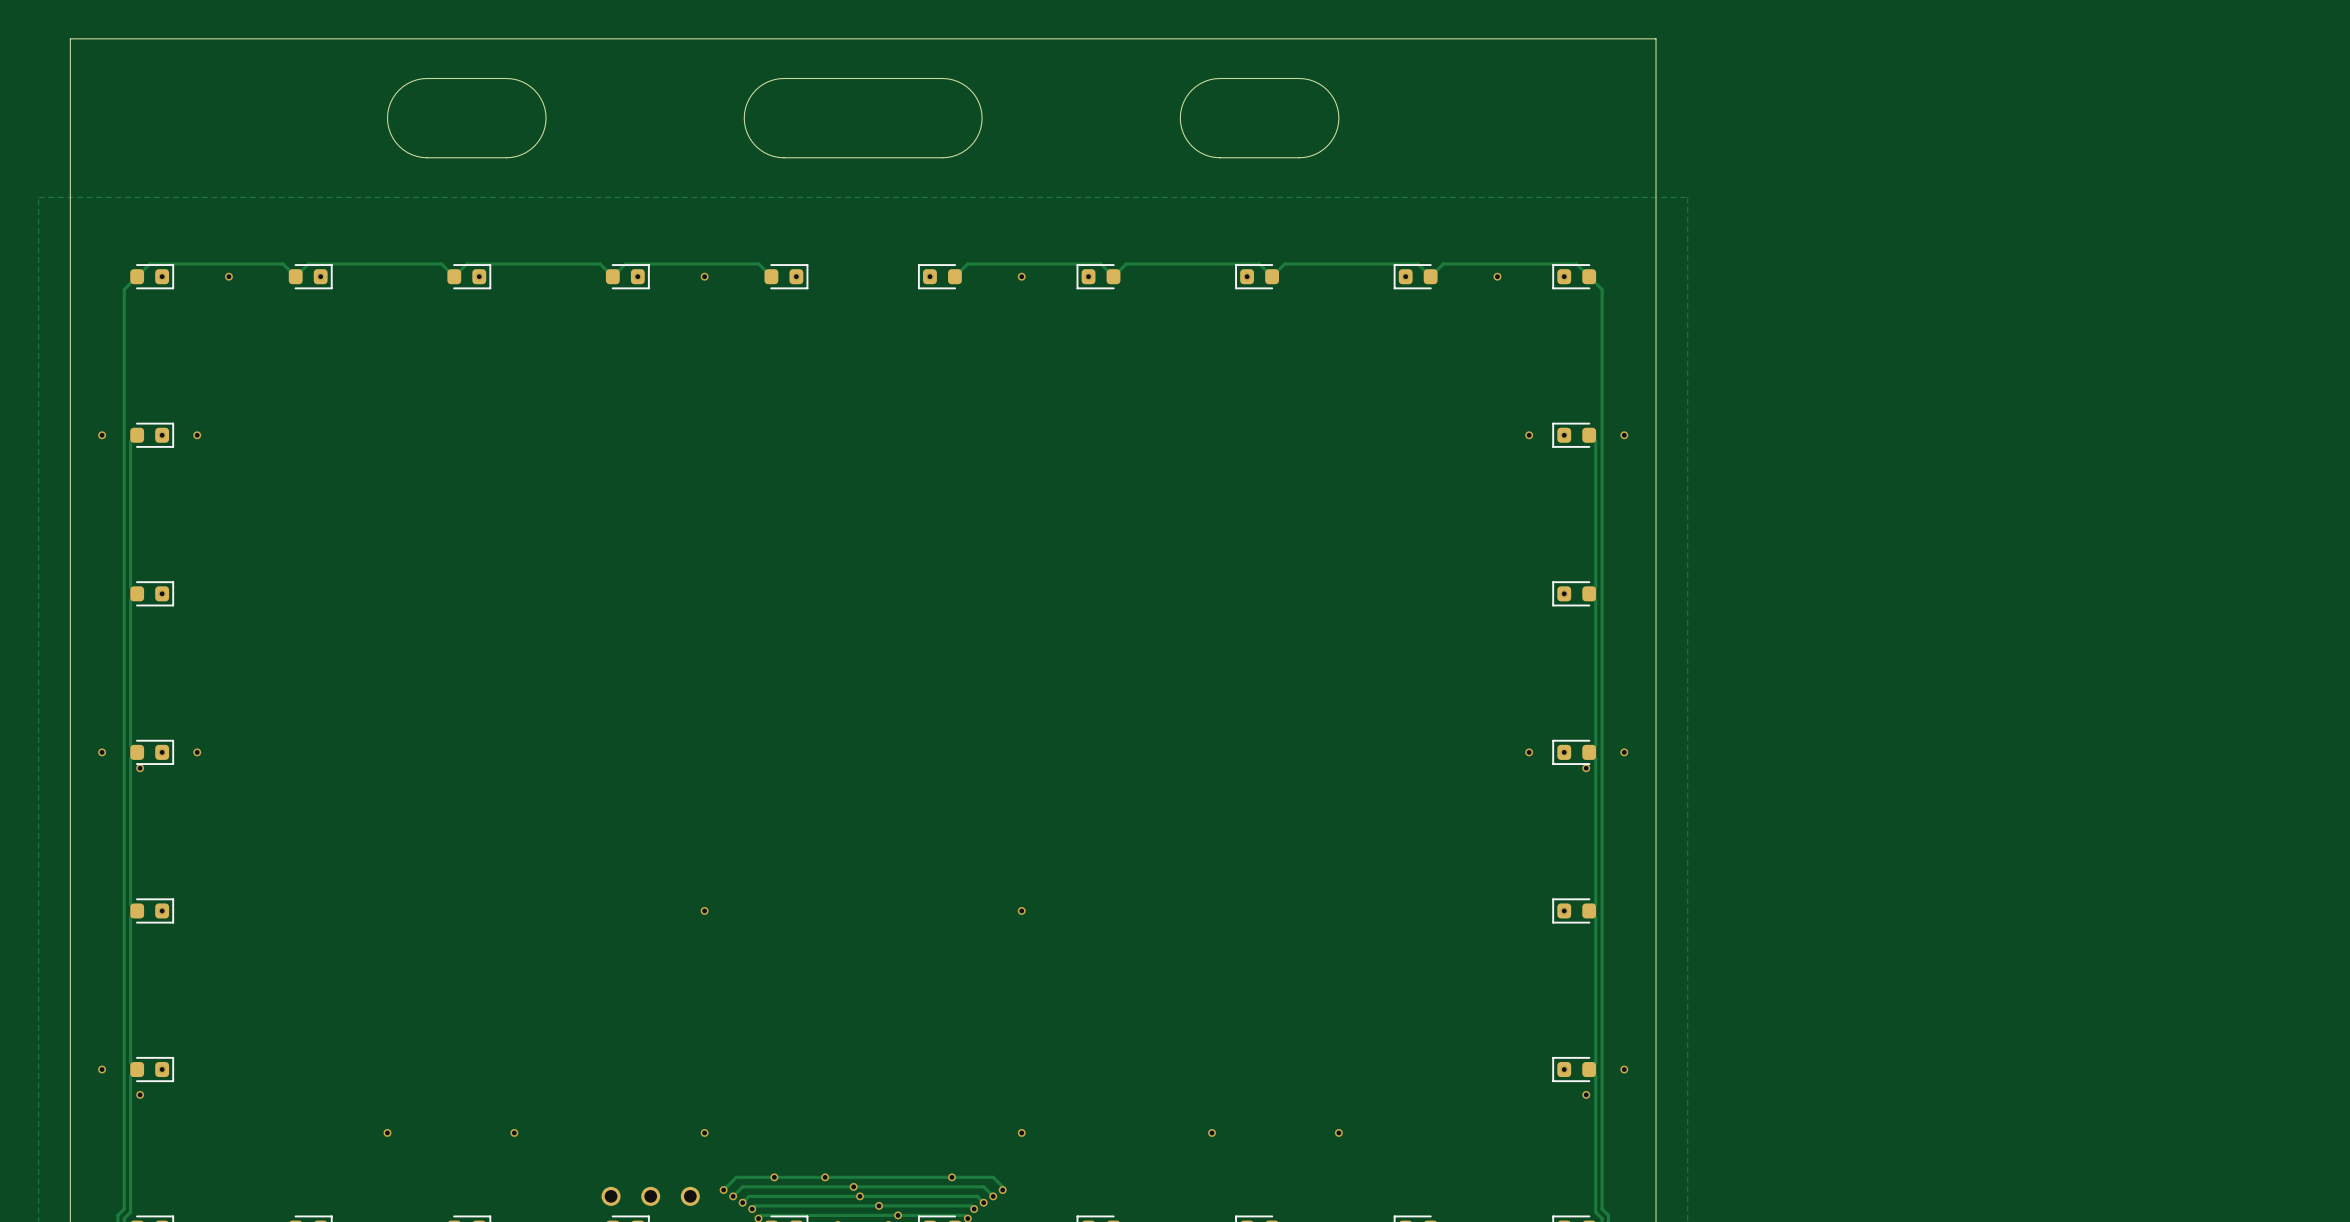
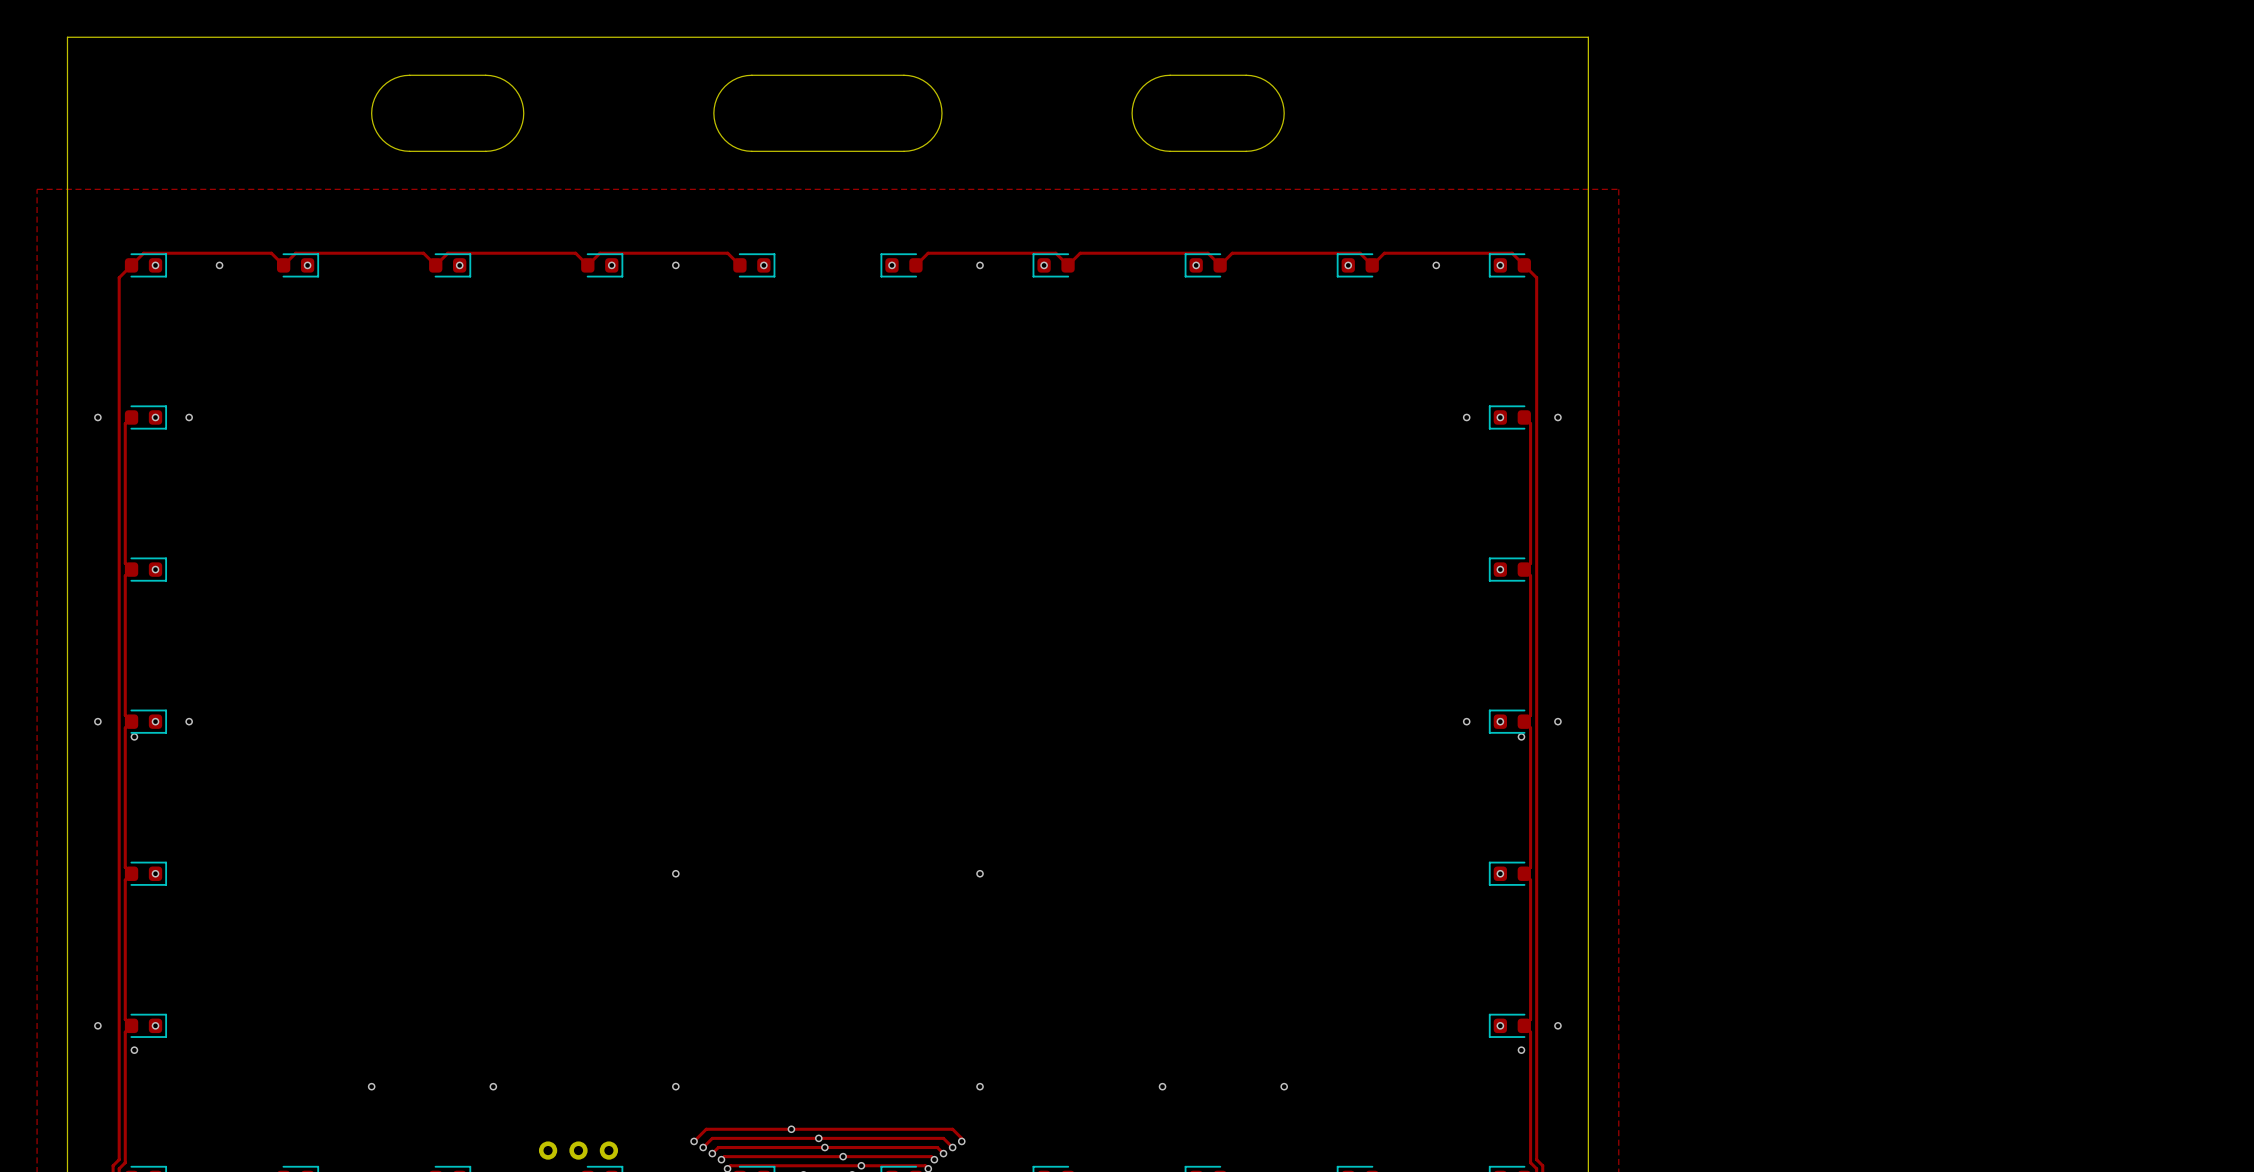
via: (774, 1177) -> none
via: (951, 1177) -> none
part: (650, 1196) -> none
part: none -> (578, 1150)

